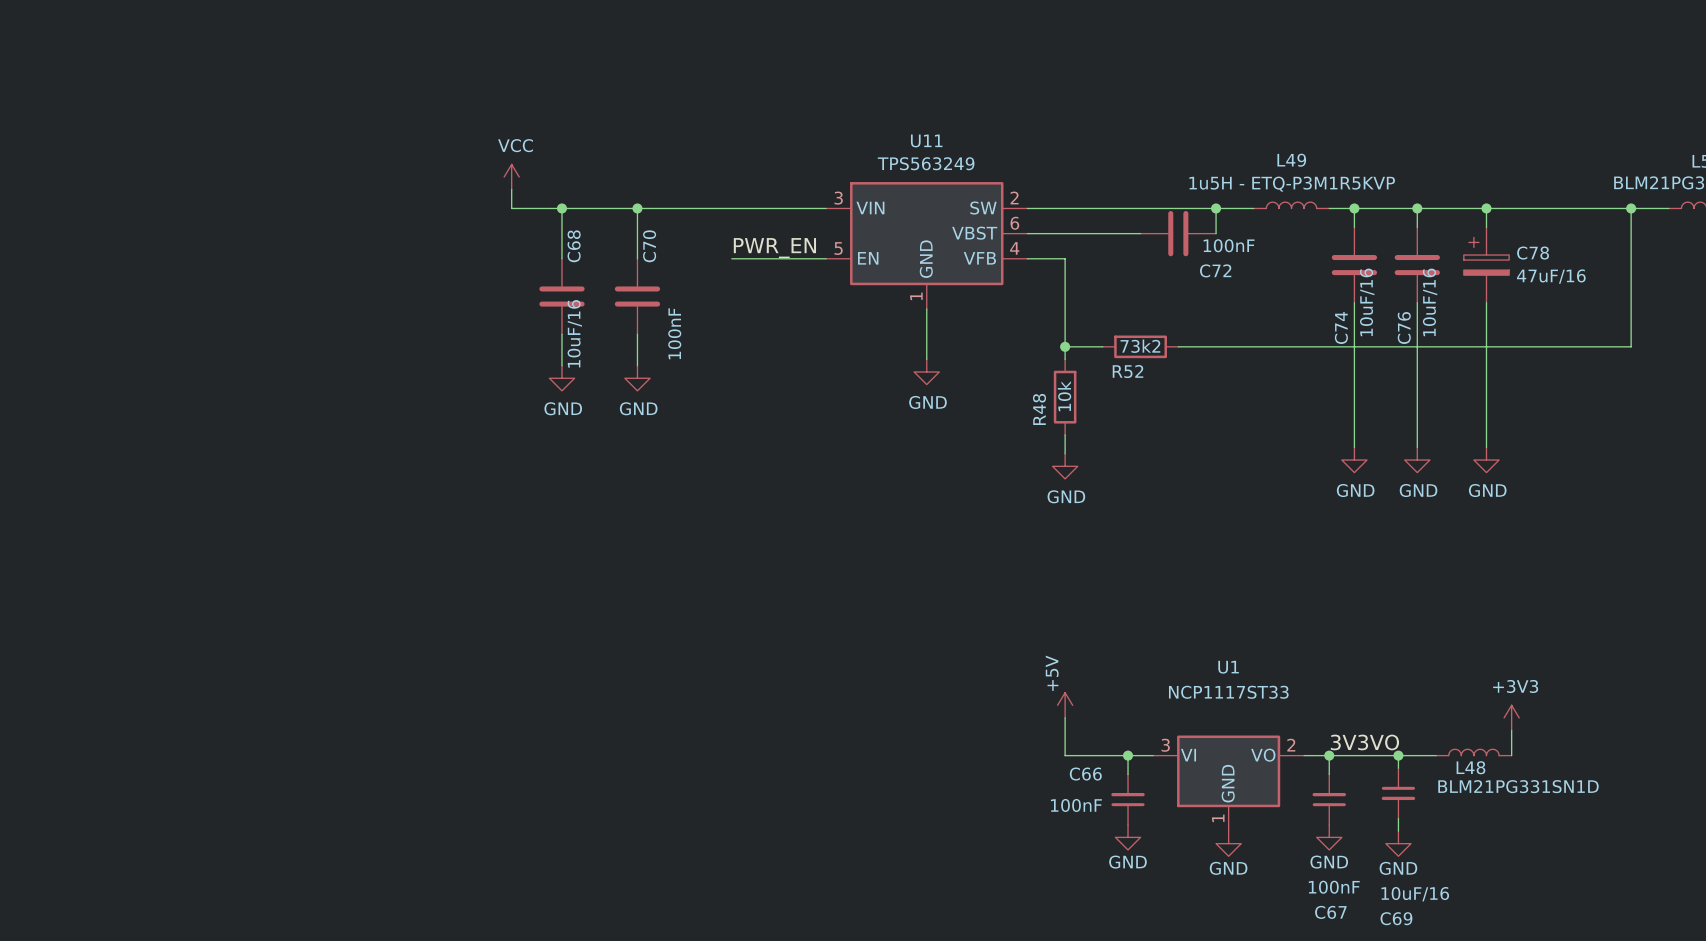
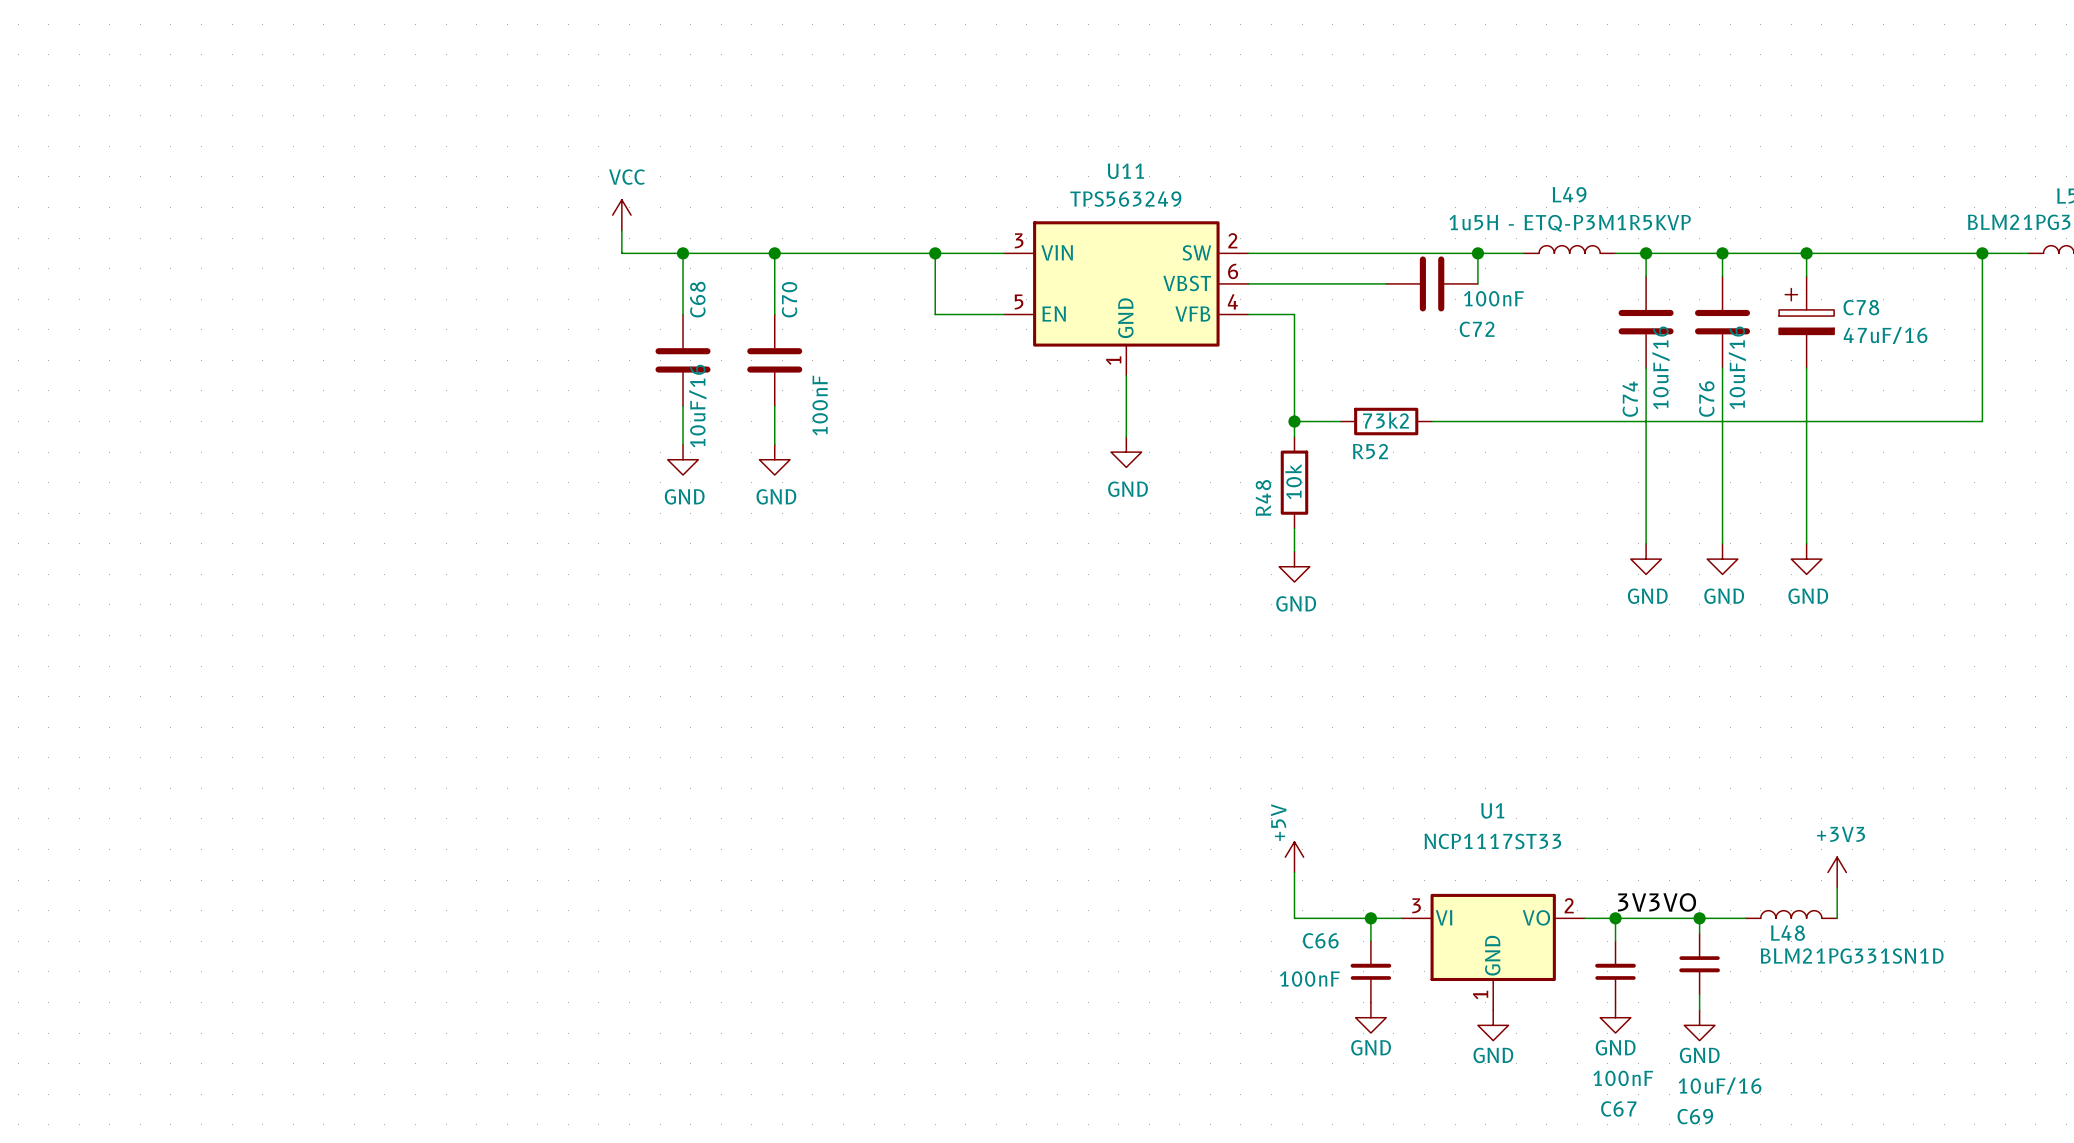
junction: none -> (935, 253)
label: PWR_EN (774, 248) -> none
wire: (731, 258) (769, 258) -> (935, 253) (935, 314)

